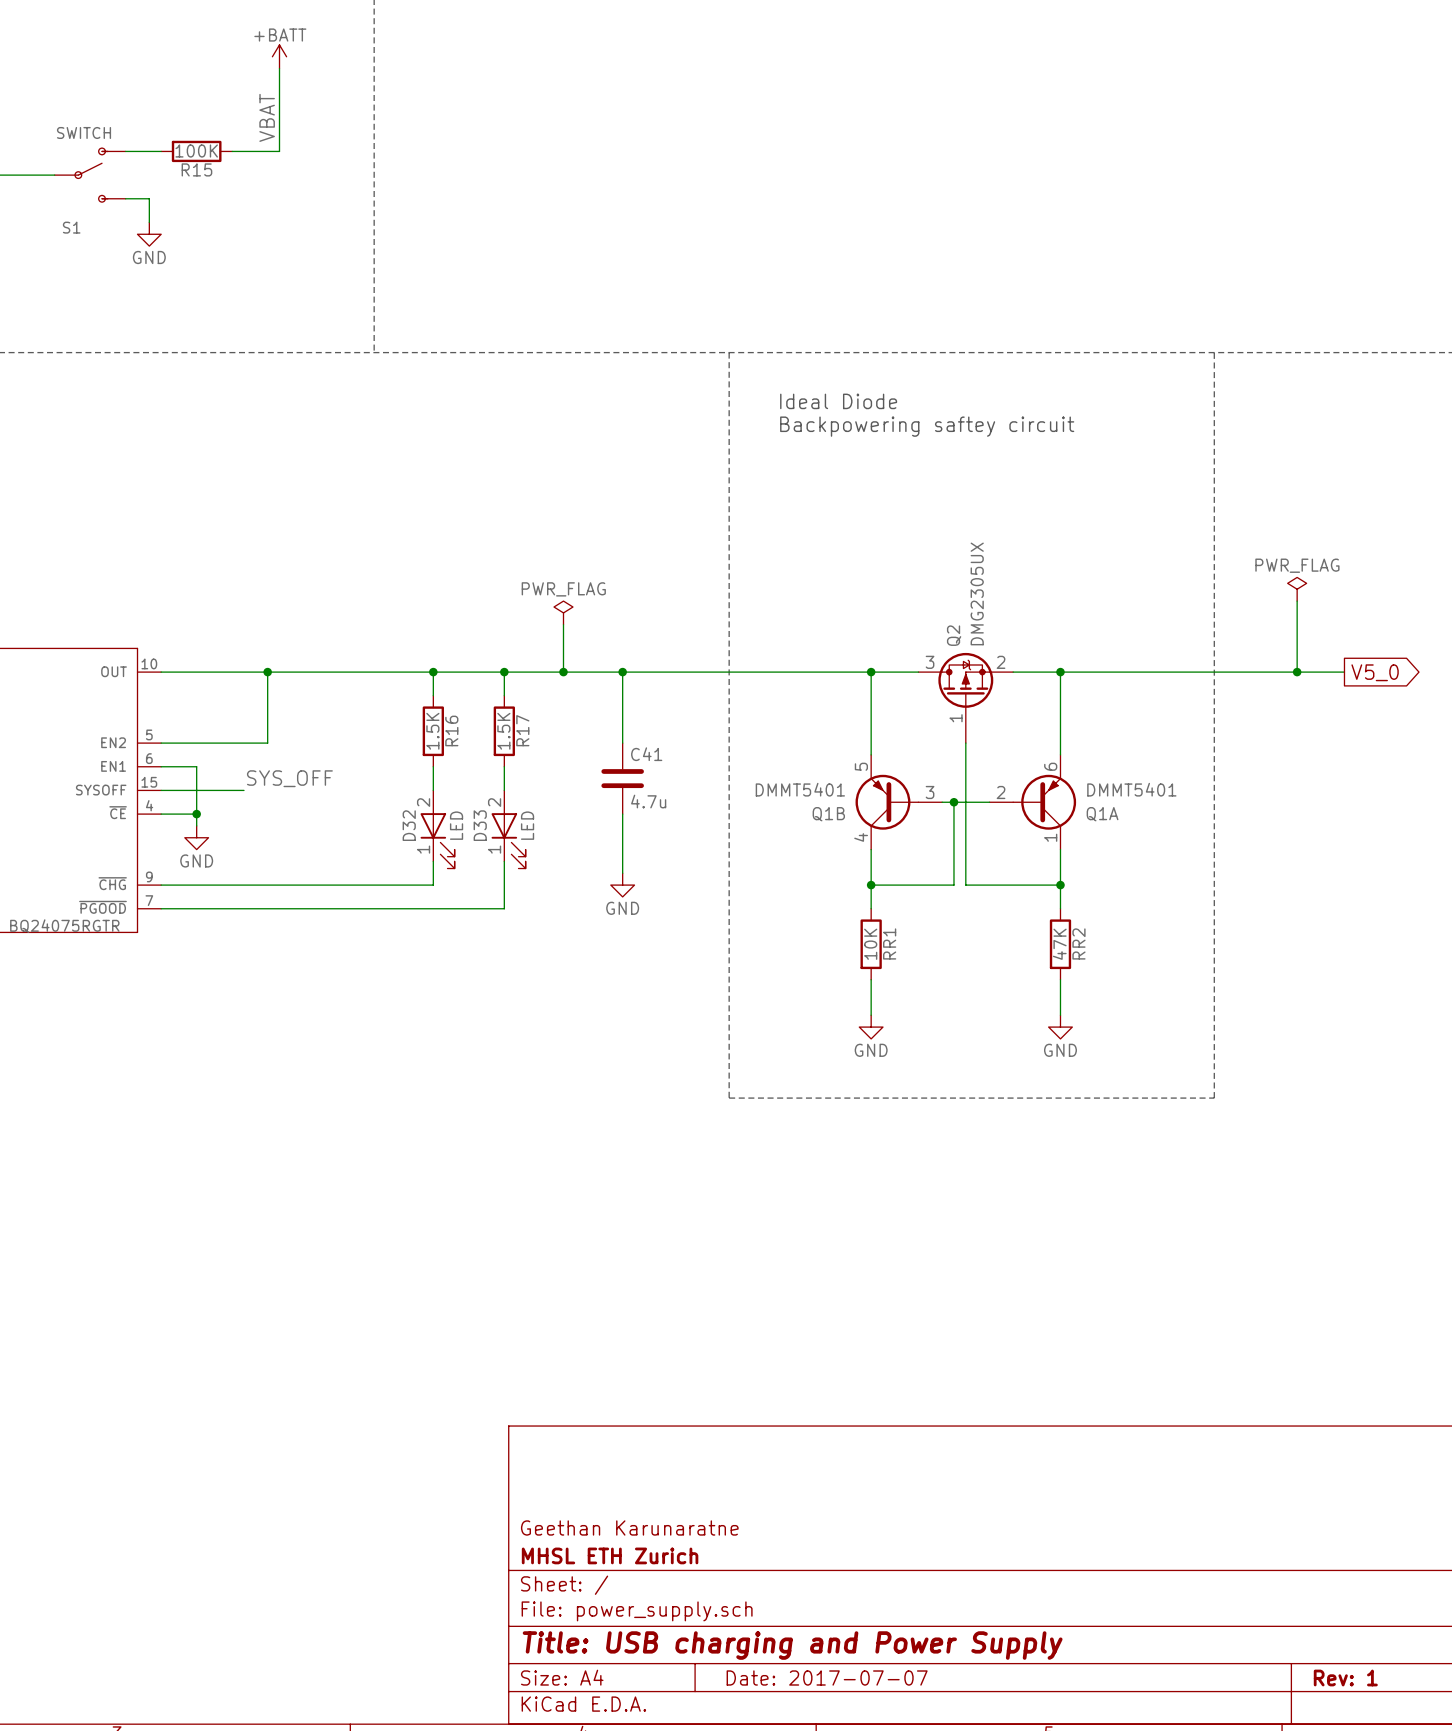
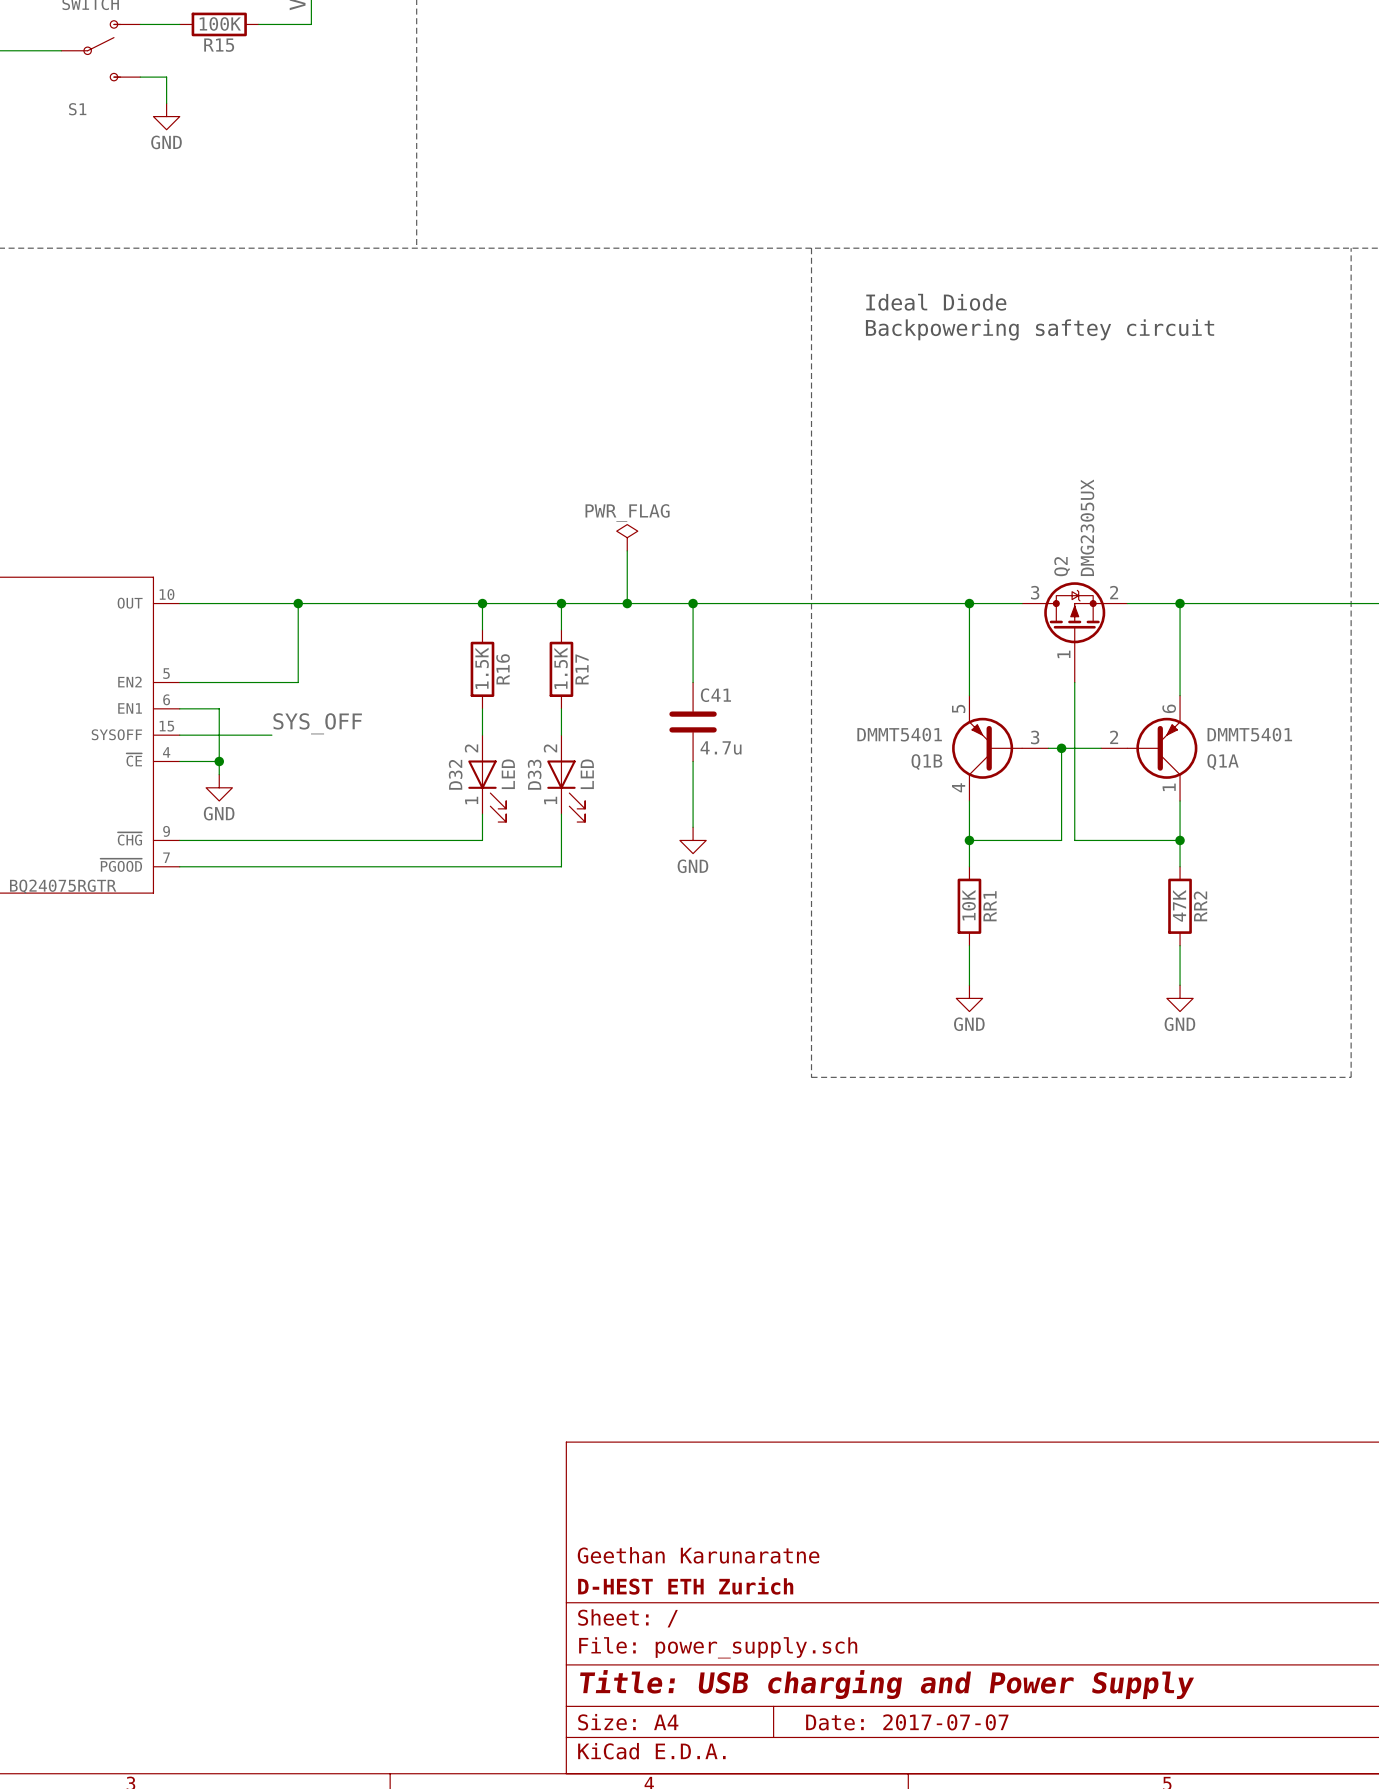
title block: MHSL ETH Zurich (610, 1555) -> D-HEST ETH Zurich (685, 1585)

